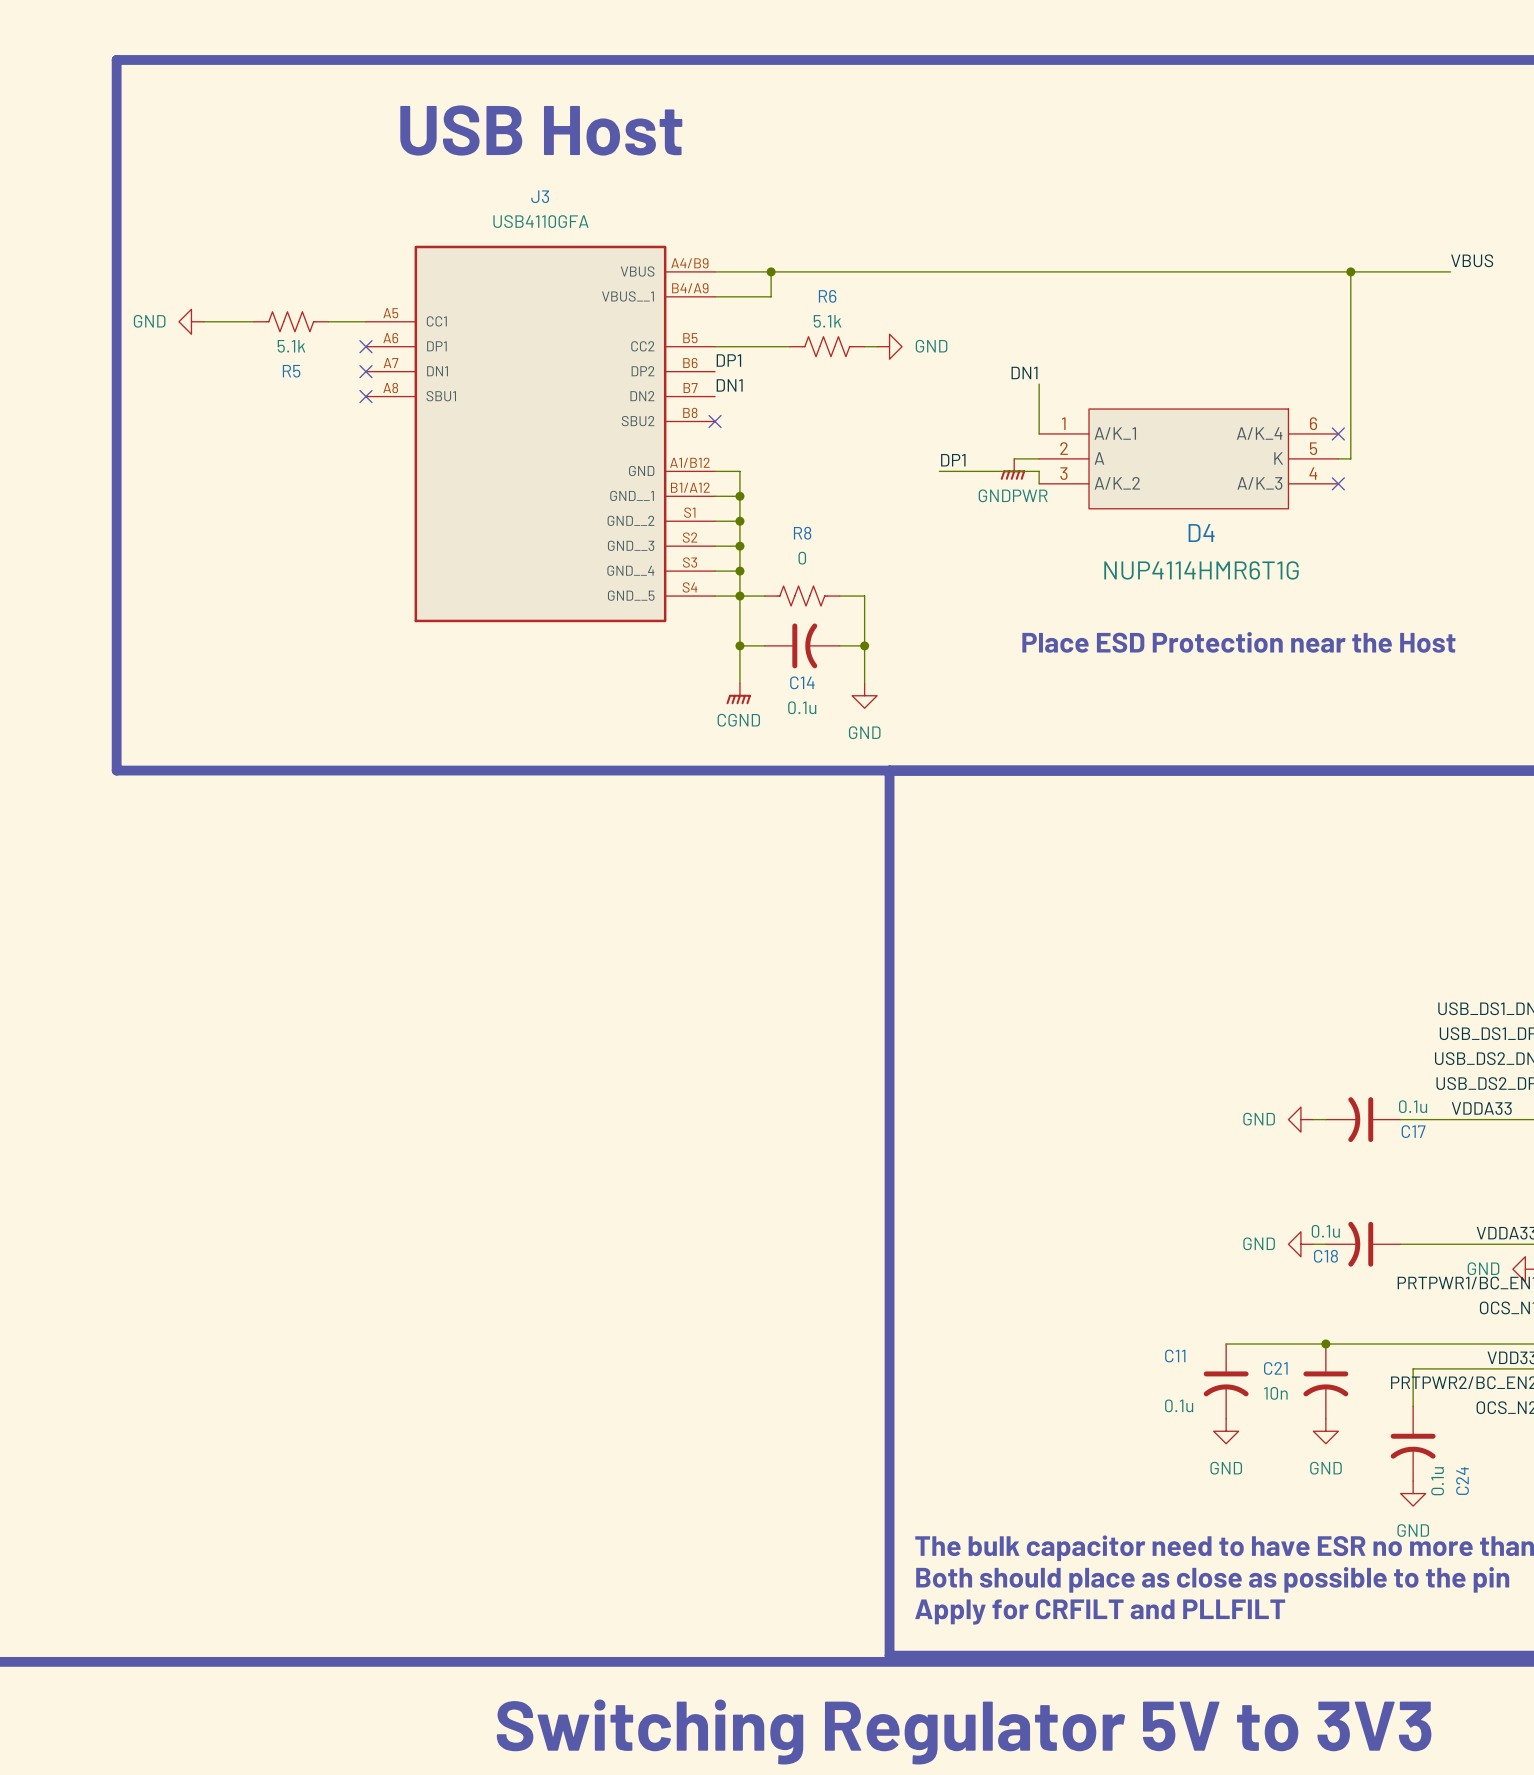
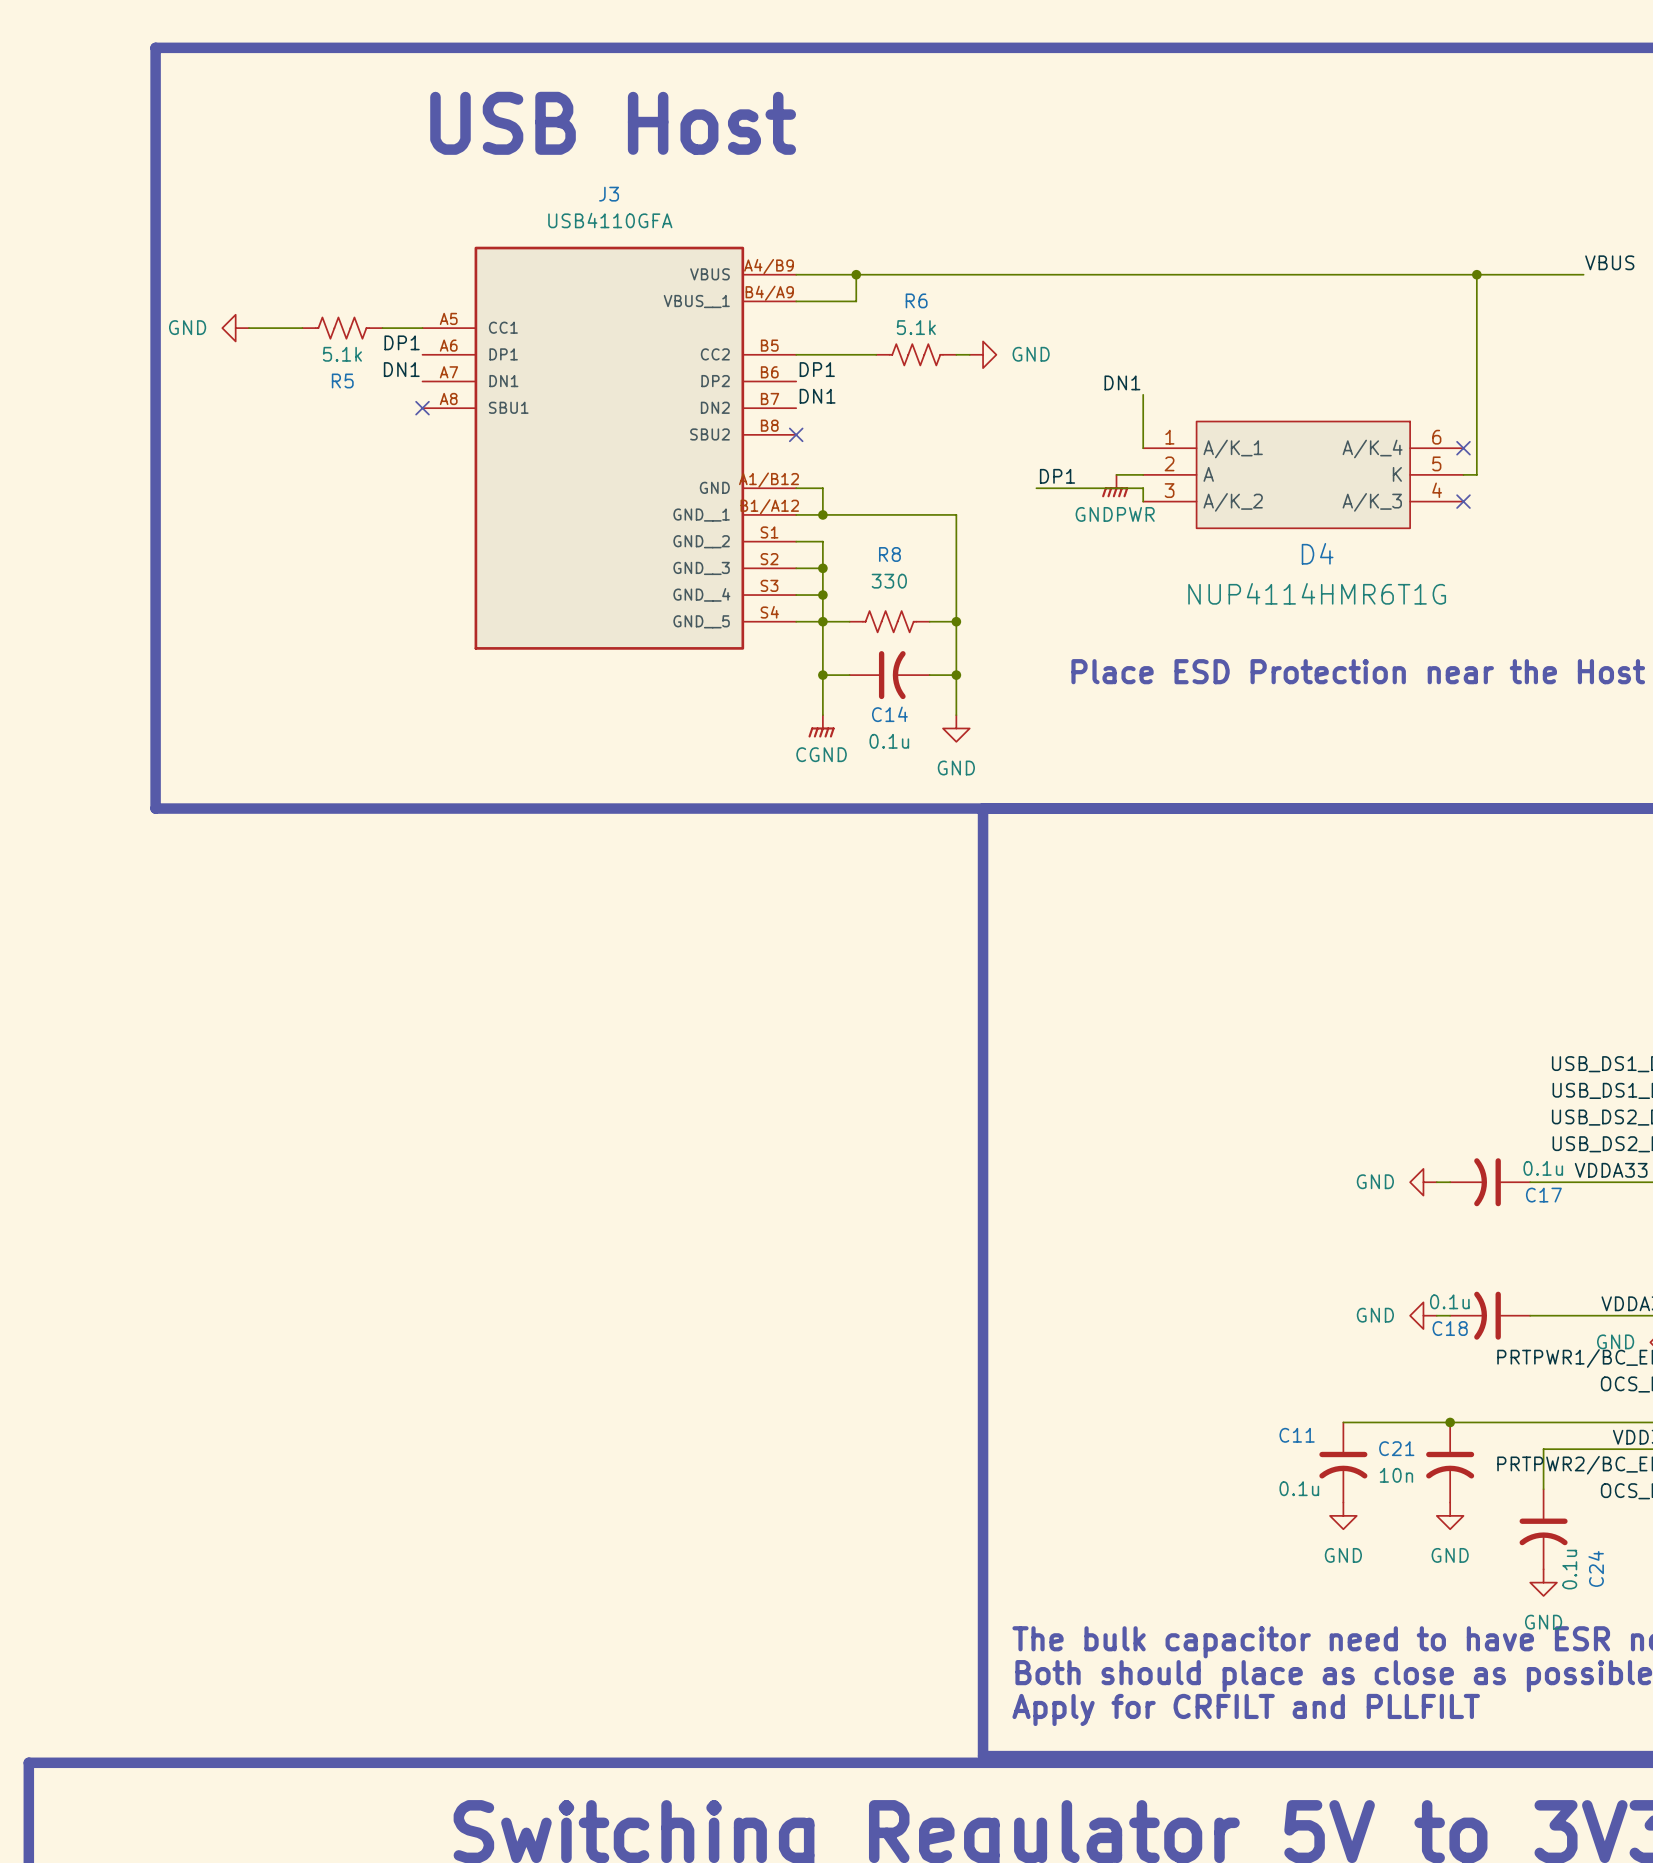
label: none -> DP1 (402, 342)
no-connect mark: (365, 346) -> none
label: none -> DN1 (401, 369)
no-connect mark: (365, 371) -> none
wire: (739, 496) (739, 521) -> (822, 514) (956, 514) (956, 621)
junction: (739, 521) -> none
R8 value: 0 (802, 558) -> 330 (889, 581)
junction: none -> (956, 621)

